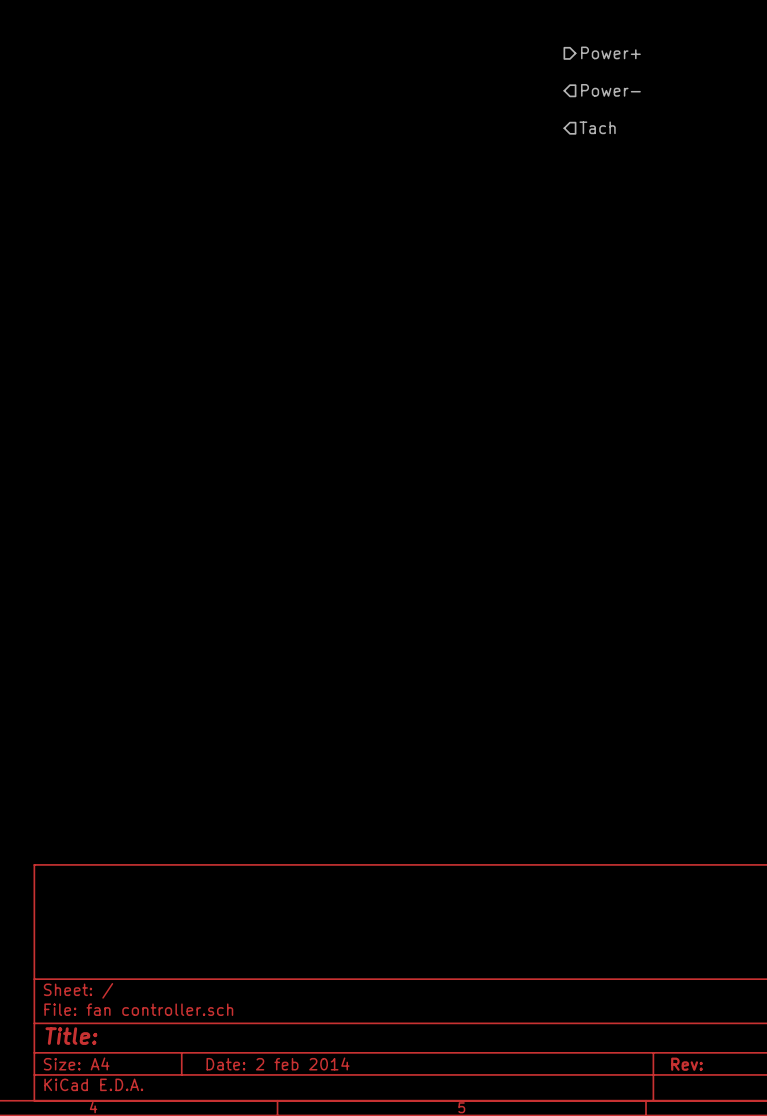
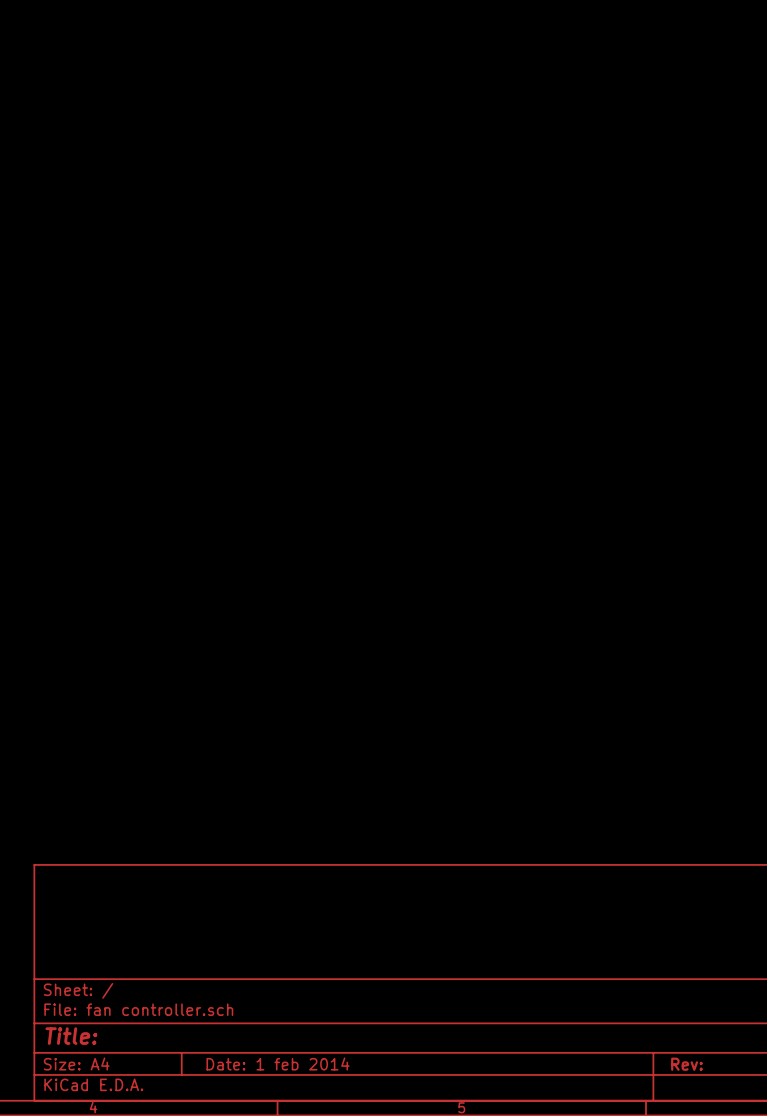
hierarchical label: Power+ (610, 52) -> none
hierarchical label: Power- (610, 90) -> none
hierarchical label: Tach (597, 127) -> none
title block: Date: 2 feb 2014 (278, 1063) -> Date: 1 feb 2014 (278, 1063)

